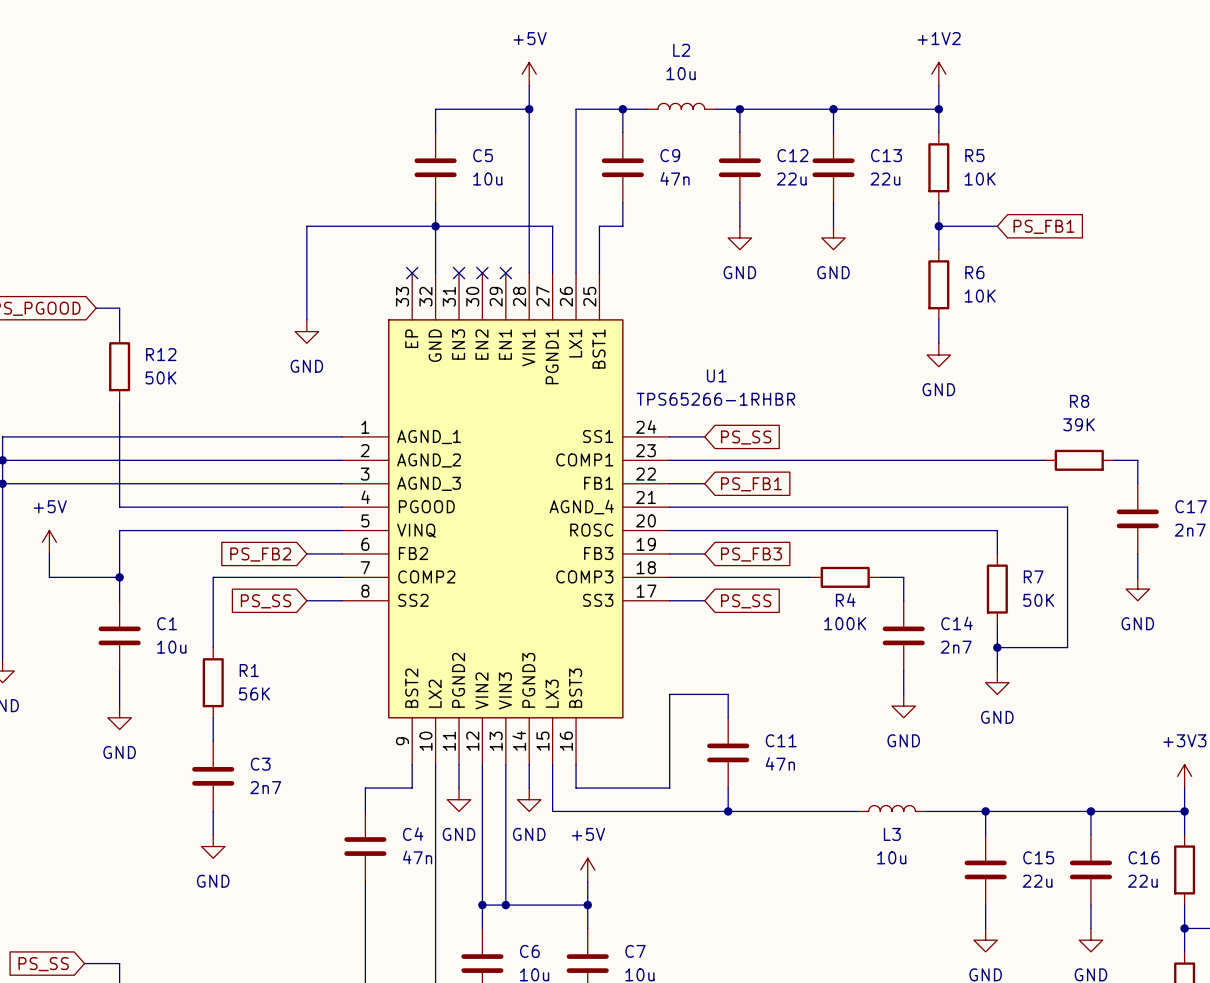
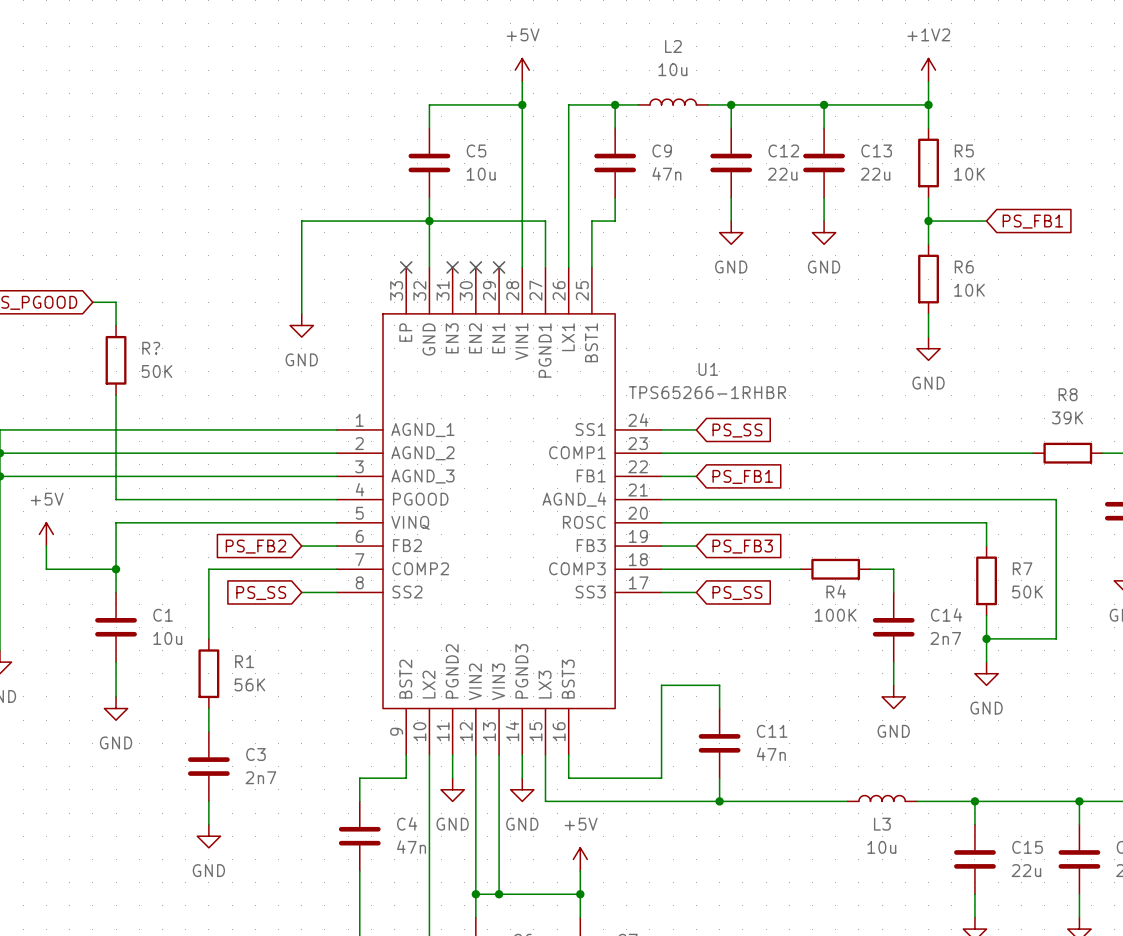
U1 symbol: [341, 273, 670, 765] -> [336, 267, 662, 755]
R12 name: R12 (161, 354) -> R? (151, 348)

